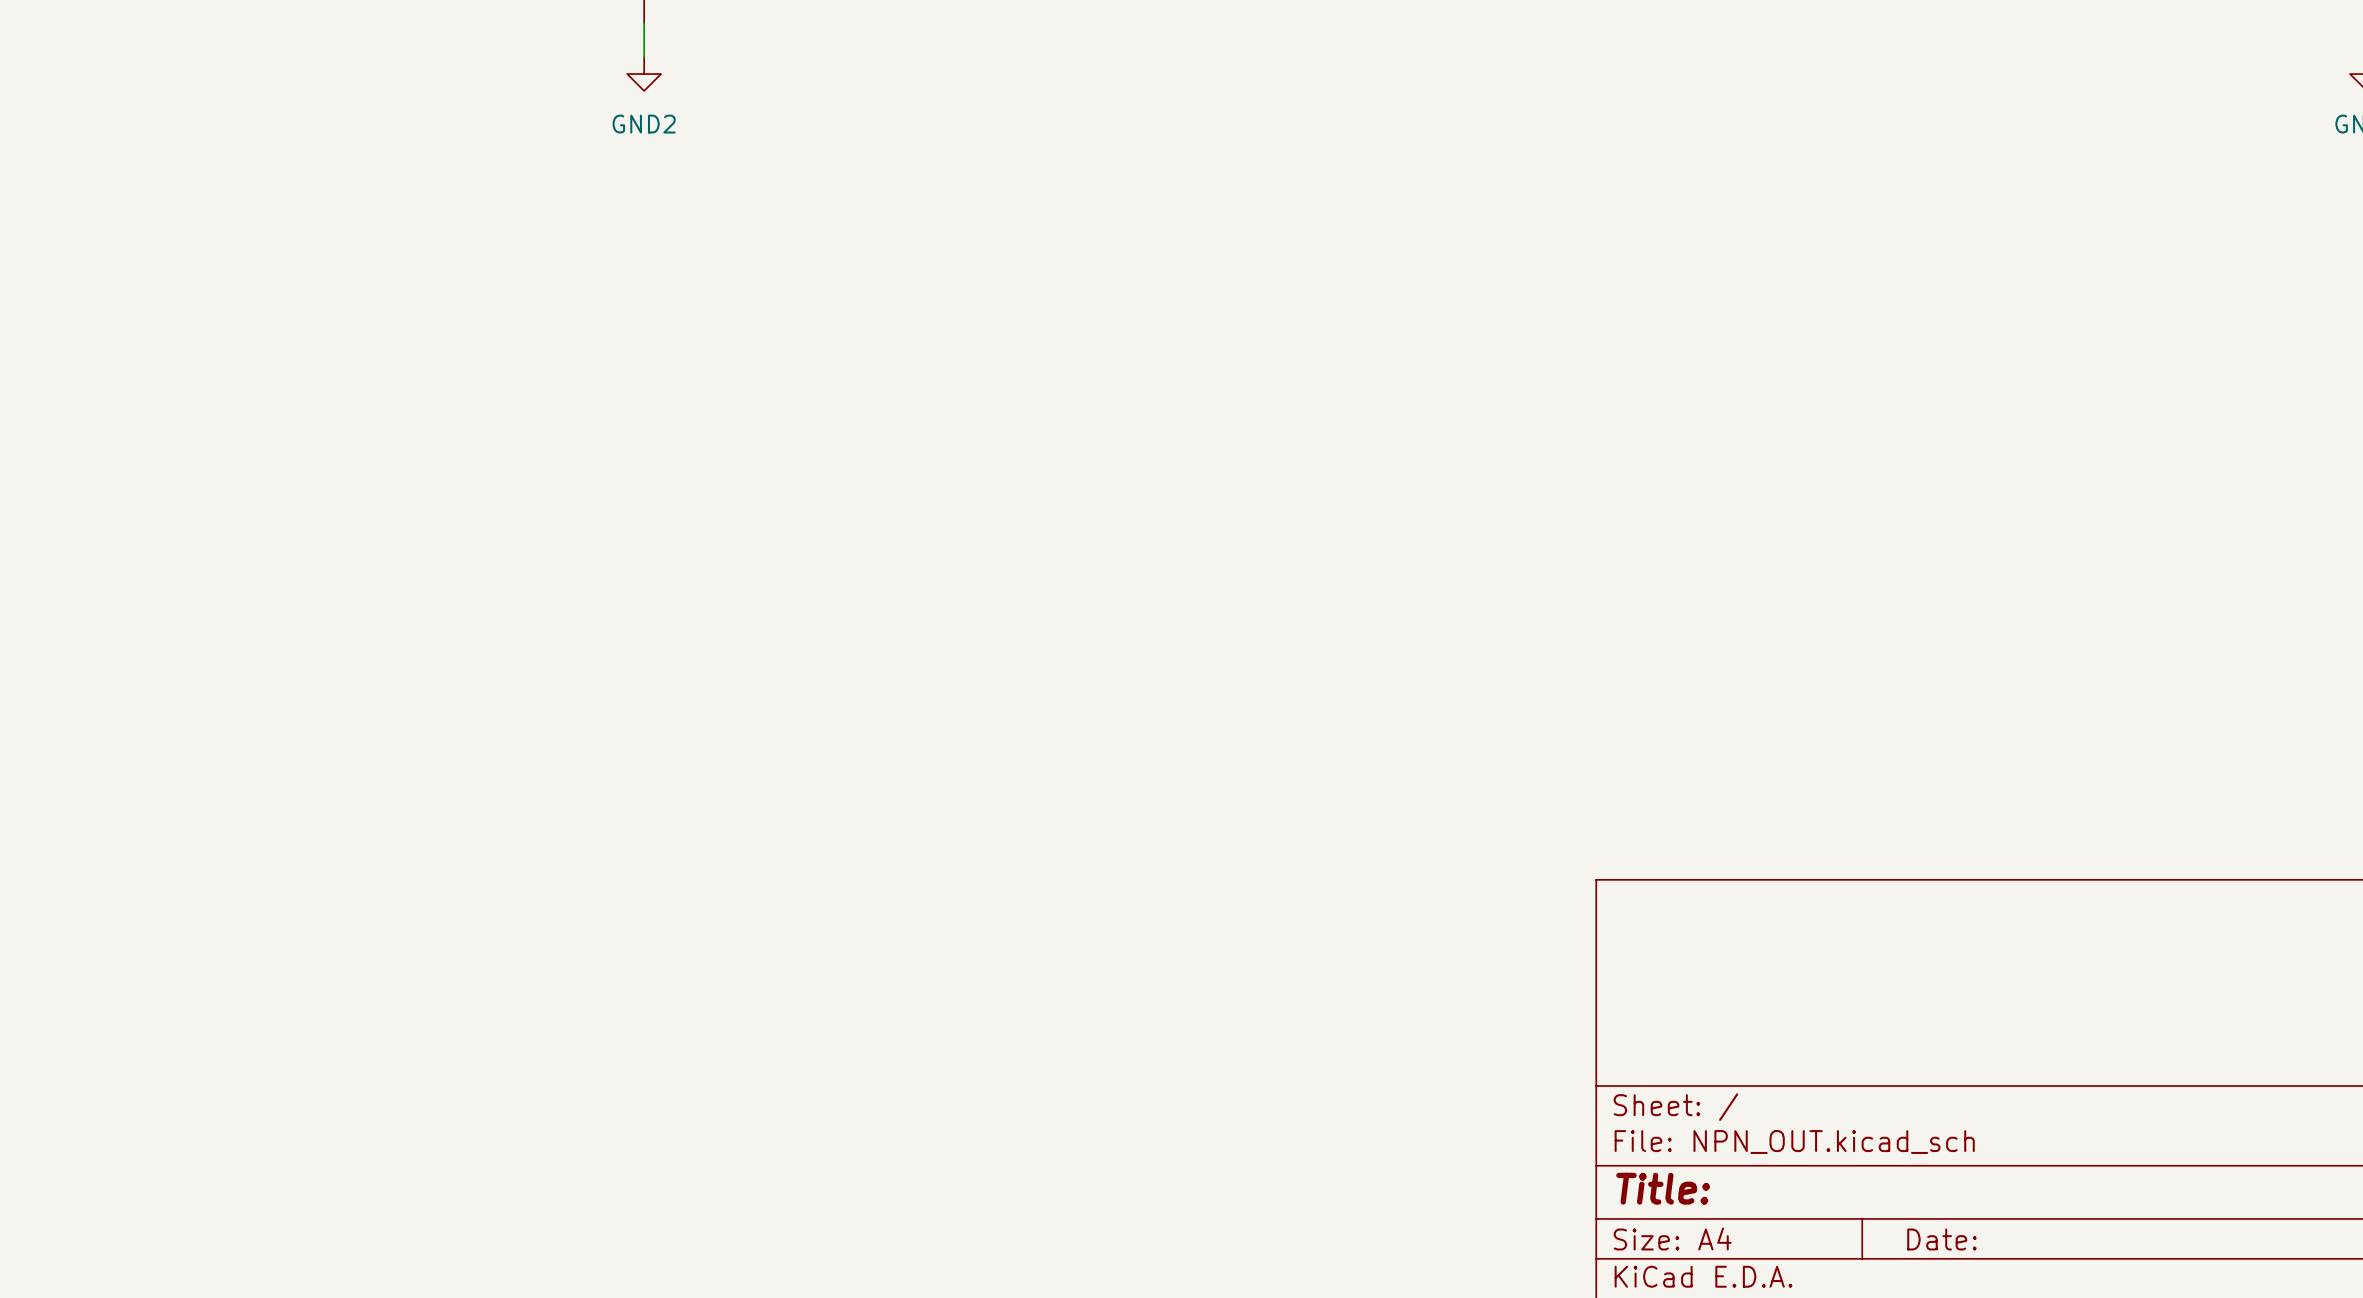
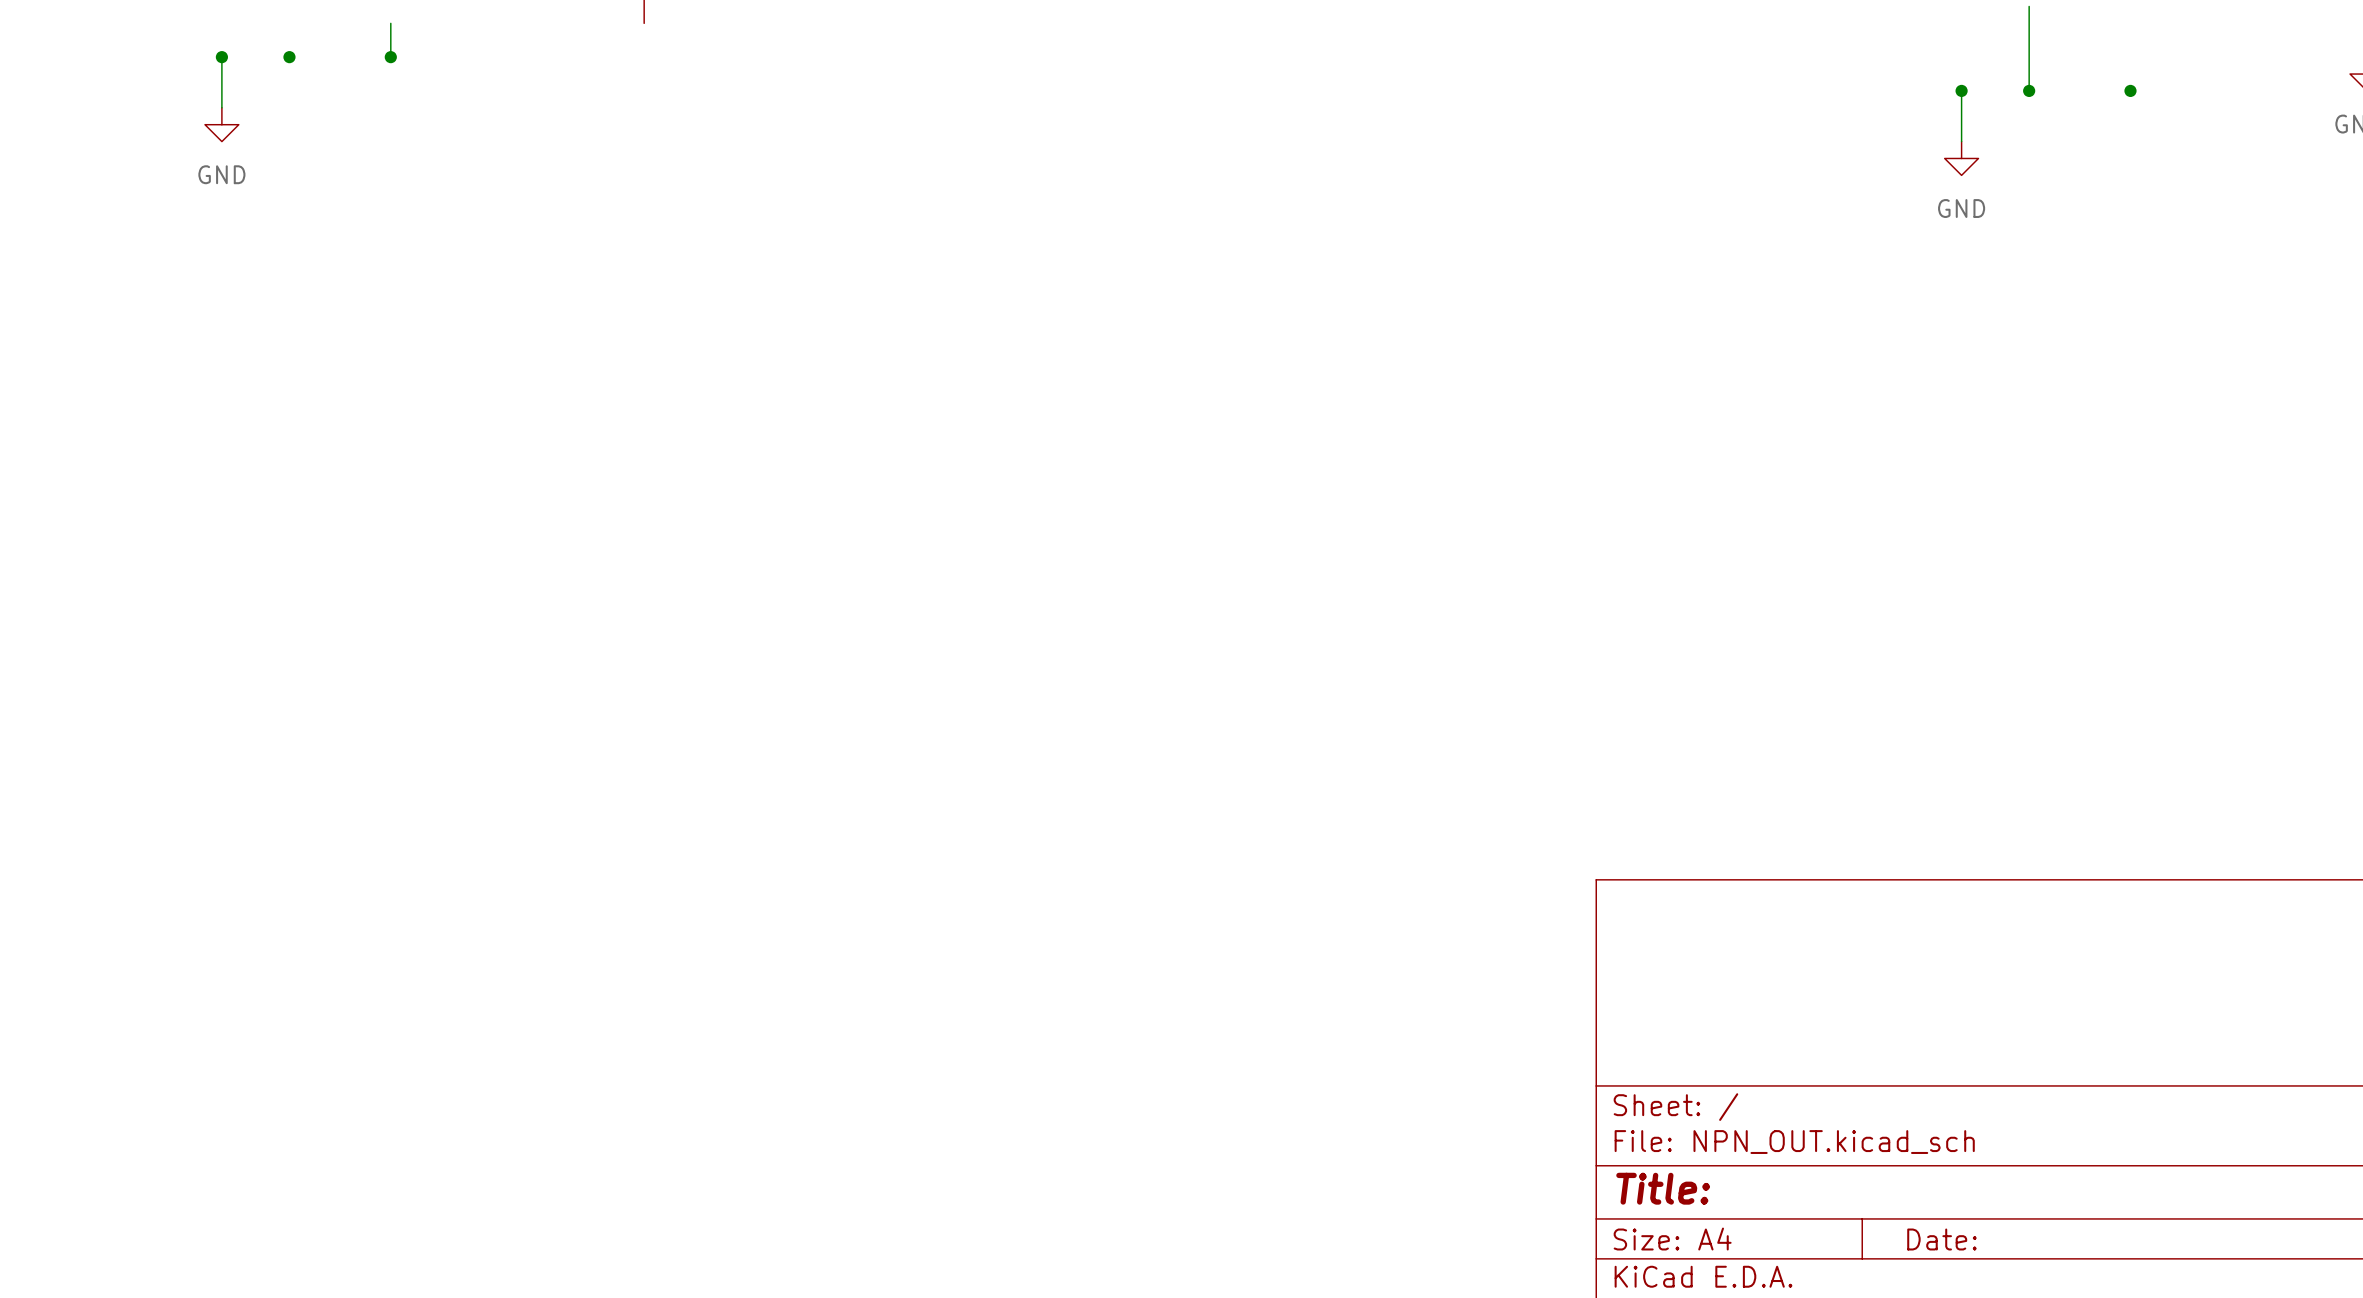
wire: none -> (2029, 6) (2029, 90)
wire: (644, 23) (644, 57) -> (390, 23) (390, 57)
wire: none -> (221, 57) (221, 107)
junction: none -> (221, 57)
junction: none -> (289, 57)
junction: none -> (390, 57)
power symbol: GND2 (644, 74) -> none
wire: none -> (1961, 90) (1961, 141)
junction: none -> (1961, 90)
junction: none -> (2029, 90)
junction: none -> (2130, 90)
power symbol: none -> GND (221, 124)
power symbol: none -> GND (1961, 158)

